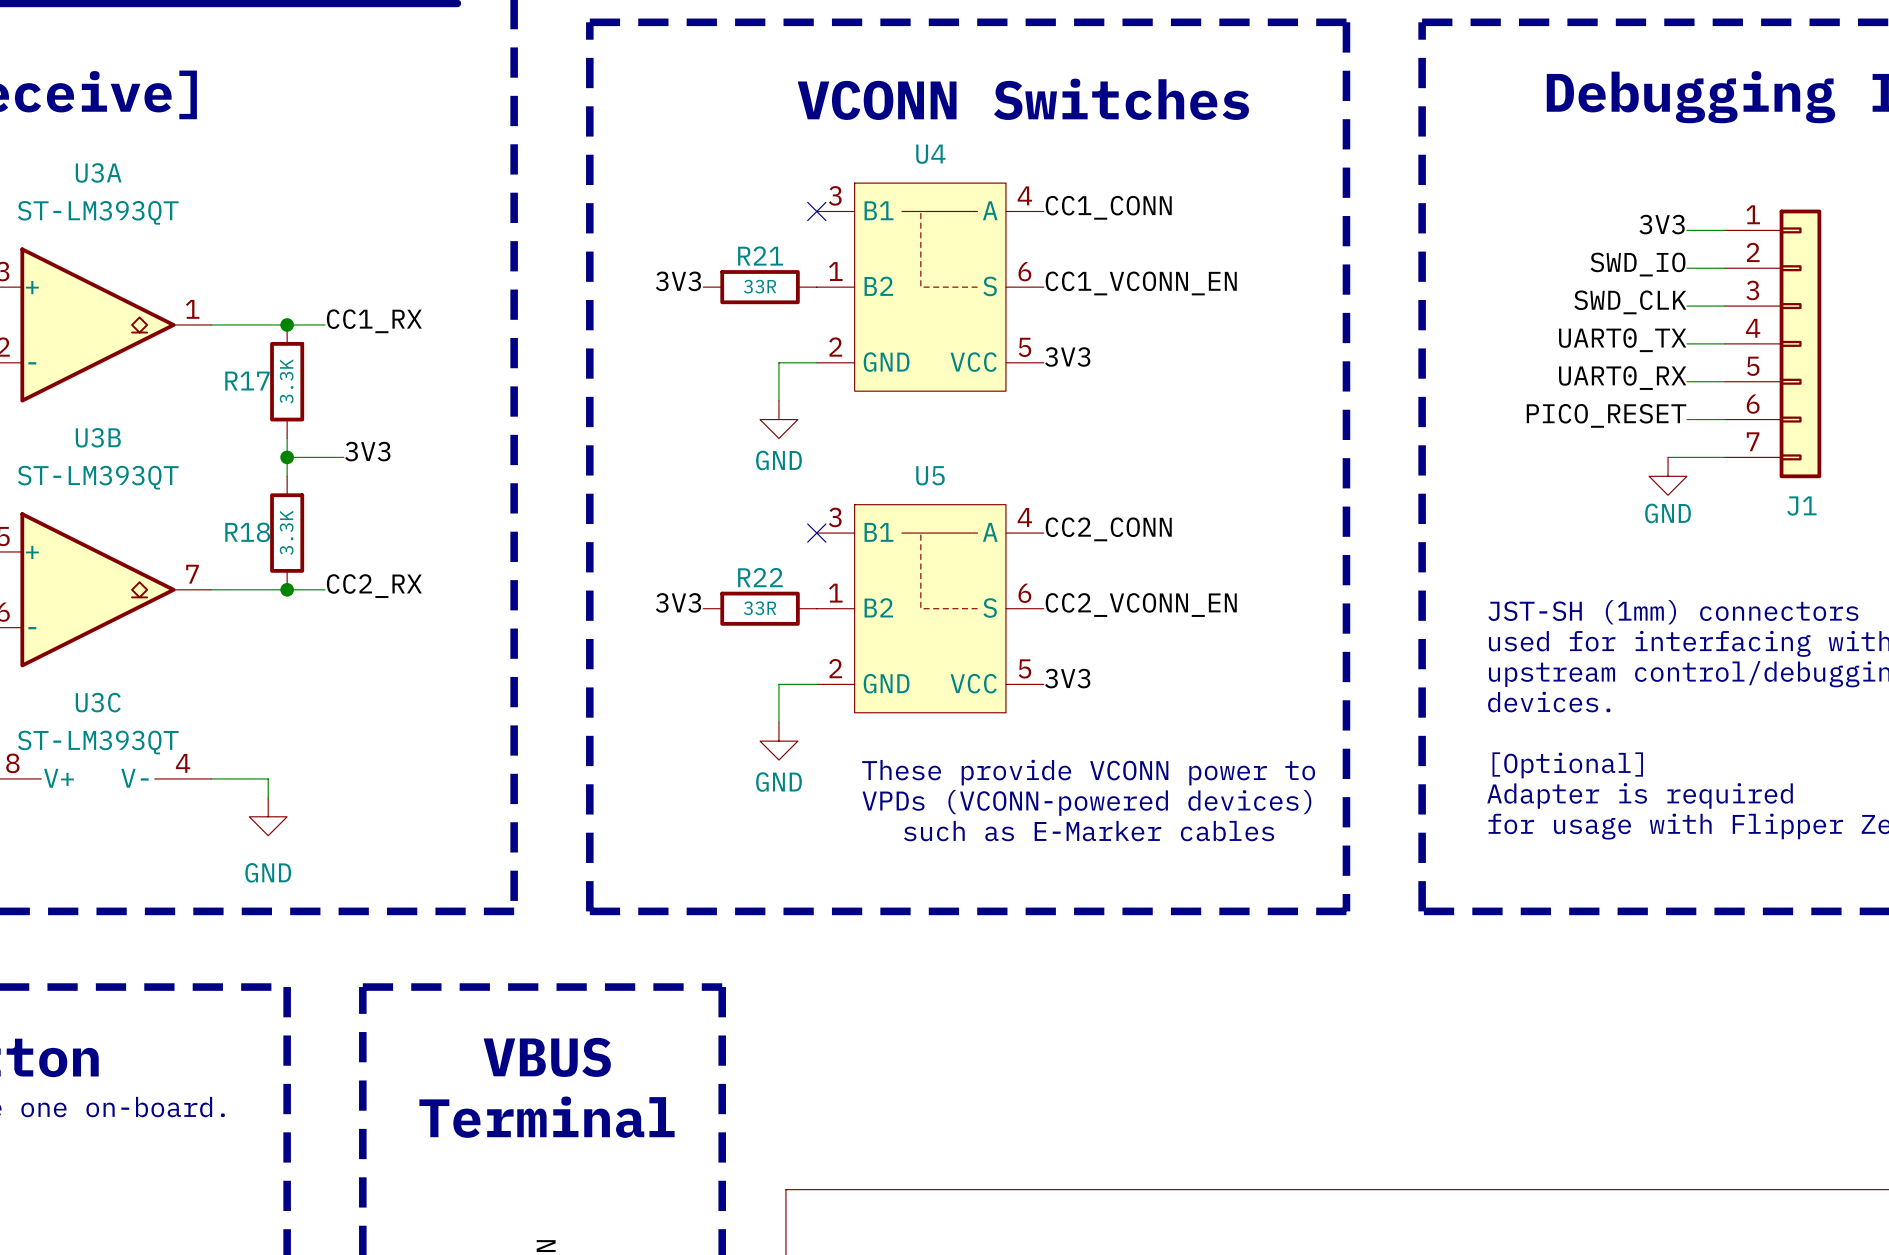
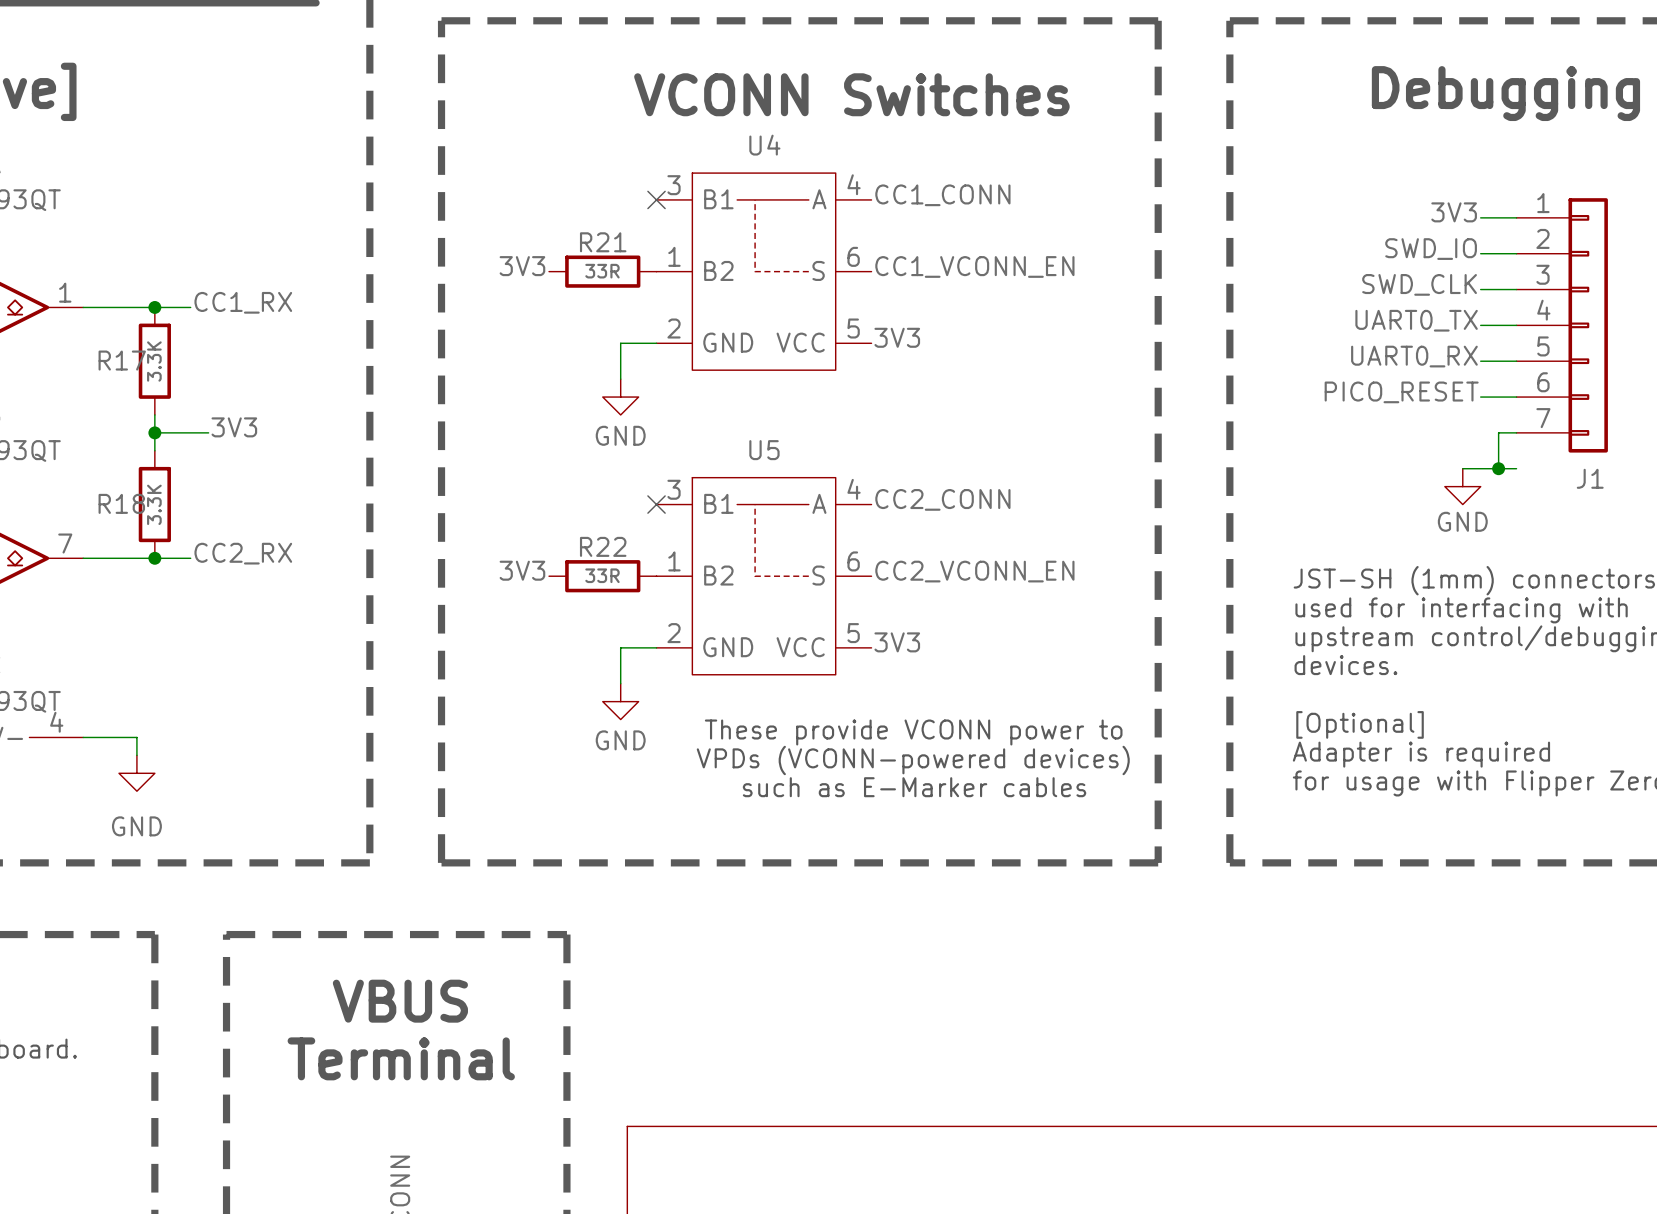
wire: (1668, 457) (1705, 457) -> (1498, 468) (1498, 432)
power symbol position: GND (1668, 476) -> GND (1462, 486)
wire: none -> (1462, 468) (1516, 468)
junction: none -> (1498, 468)

